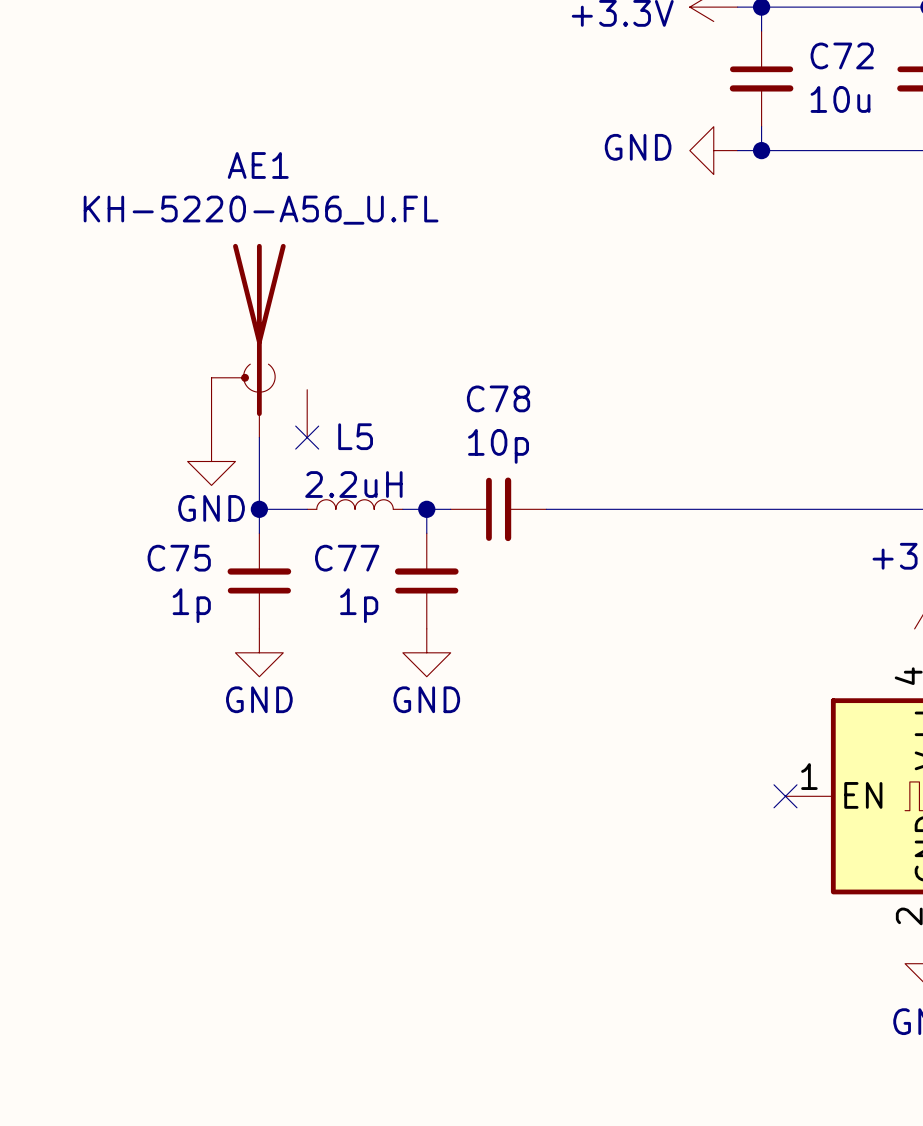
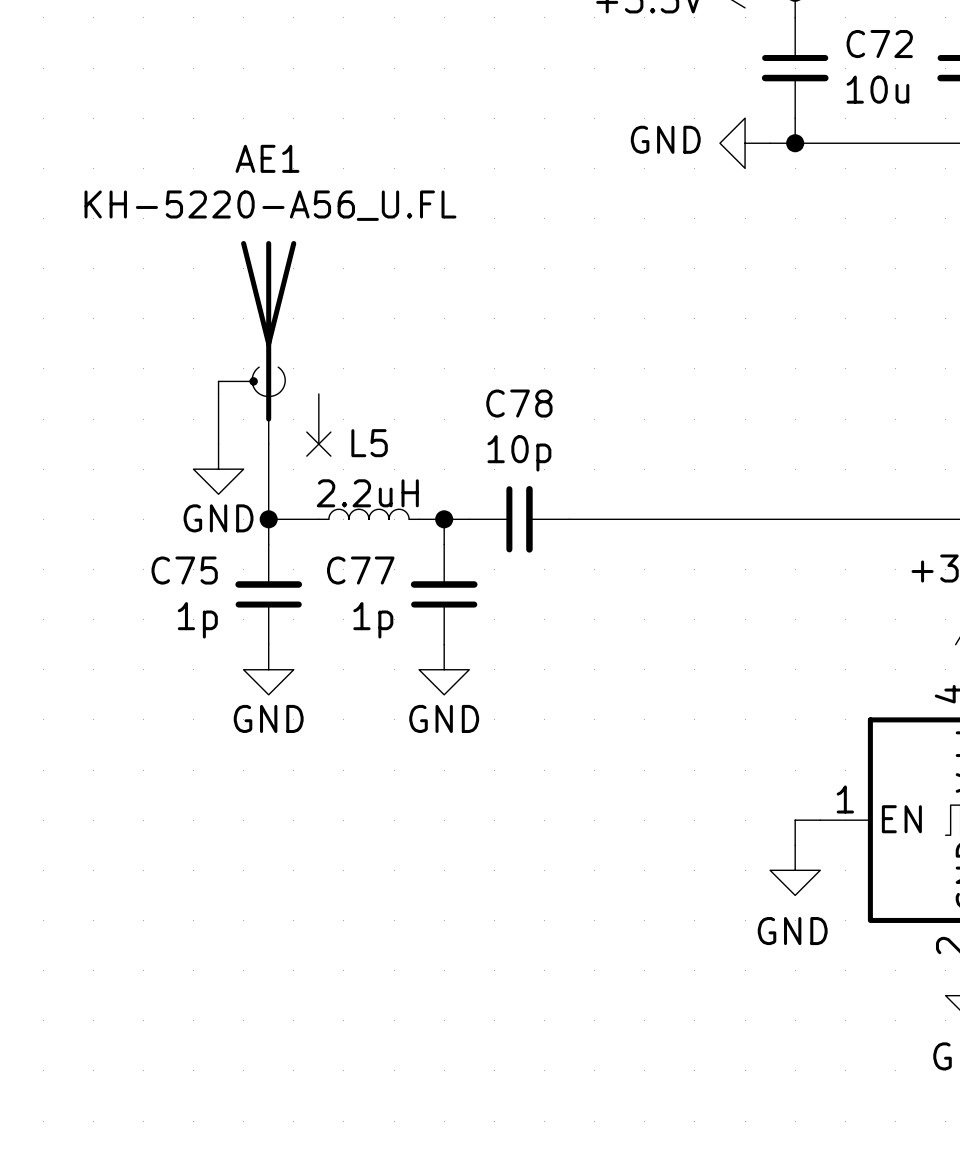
wire: none -> (820, 820) (795, 820) (795, 845)
no-connect mark: (785, 796) -> none
power symbol: none -> GND (795, 870)

